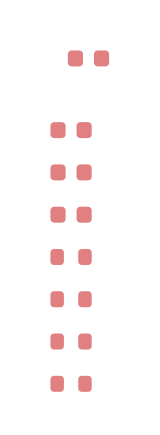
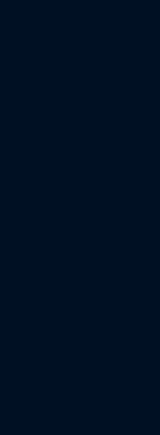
part: (88, 58) -> none
part: (71, 130) -> none
part: (71, 172) -> none
part: (71, 214) -> none
part: (71, 256) -> none
part: (71, 299) -> none
part: (71, 341) -> none
part: (71, 383) -> none

